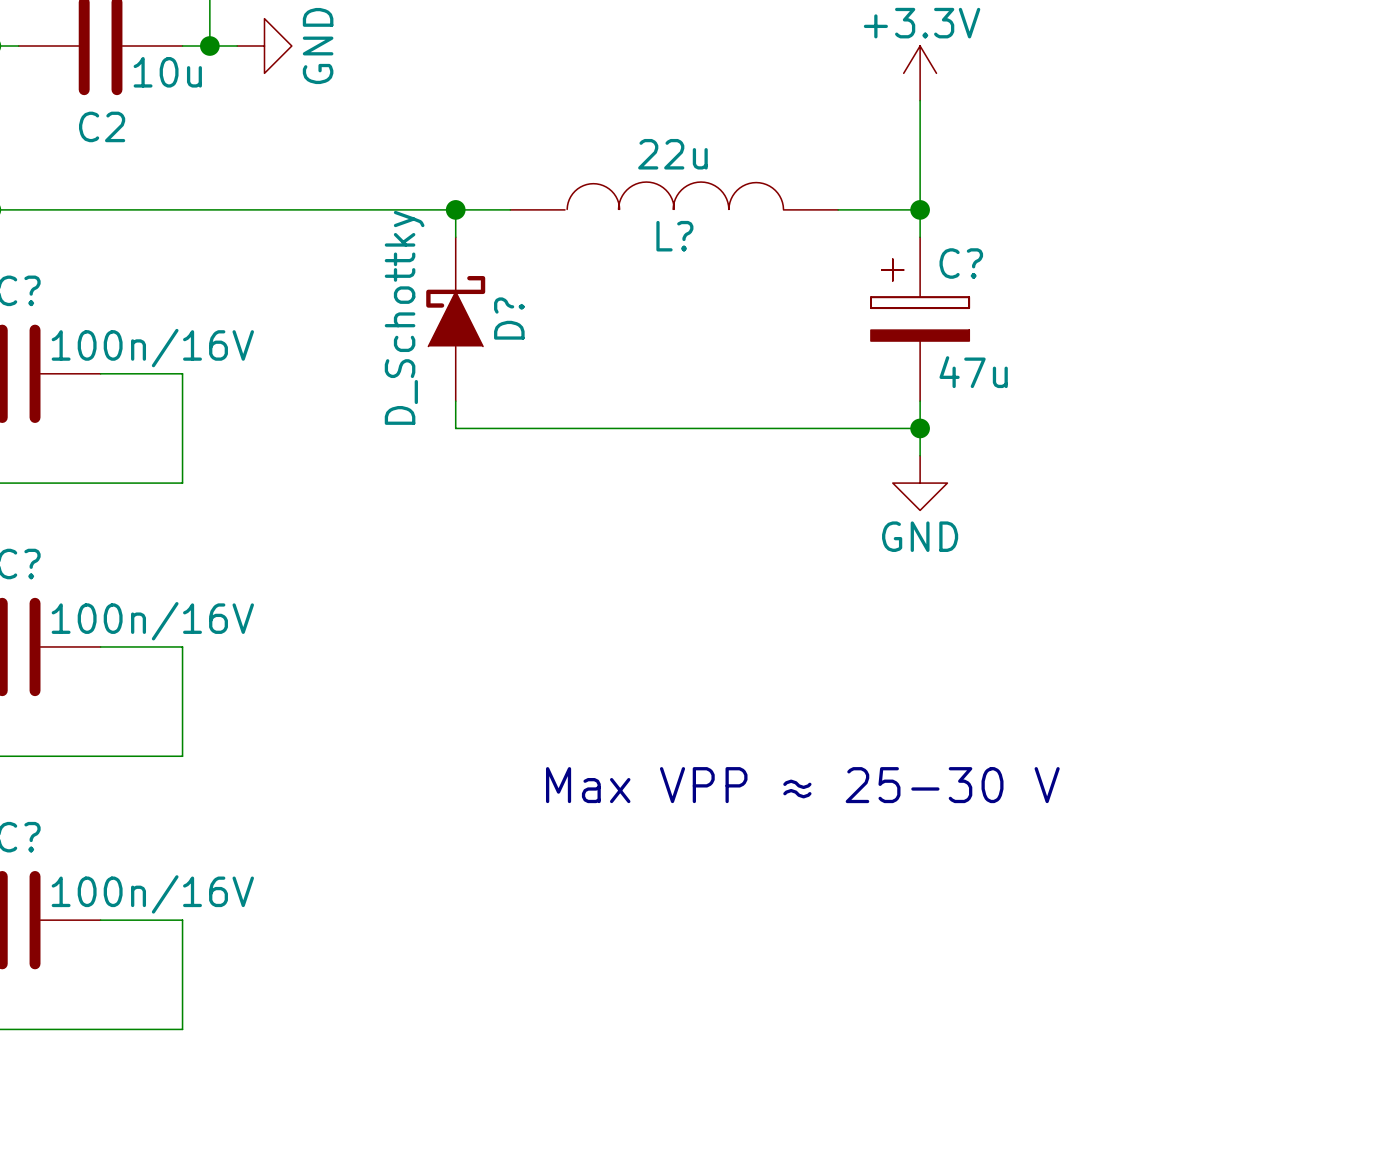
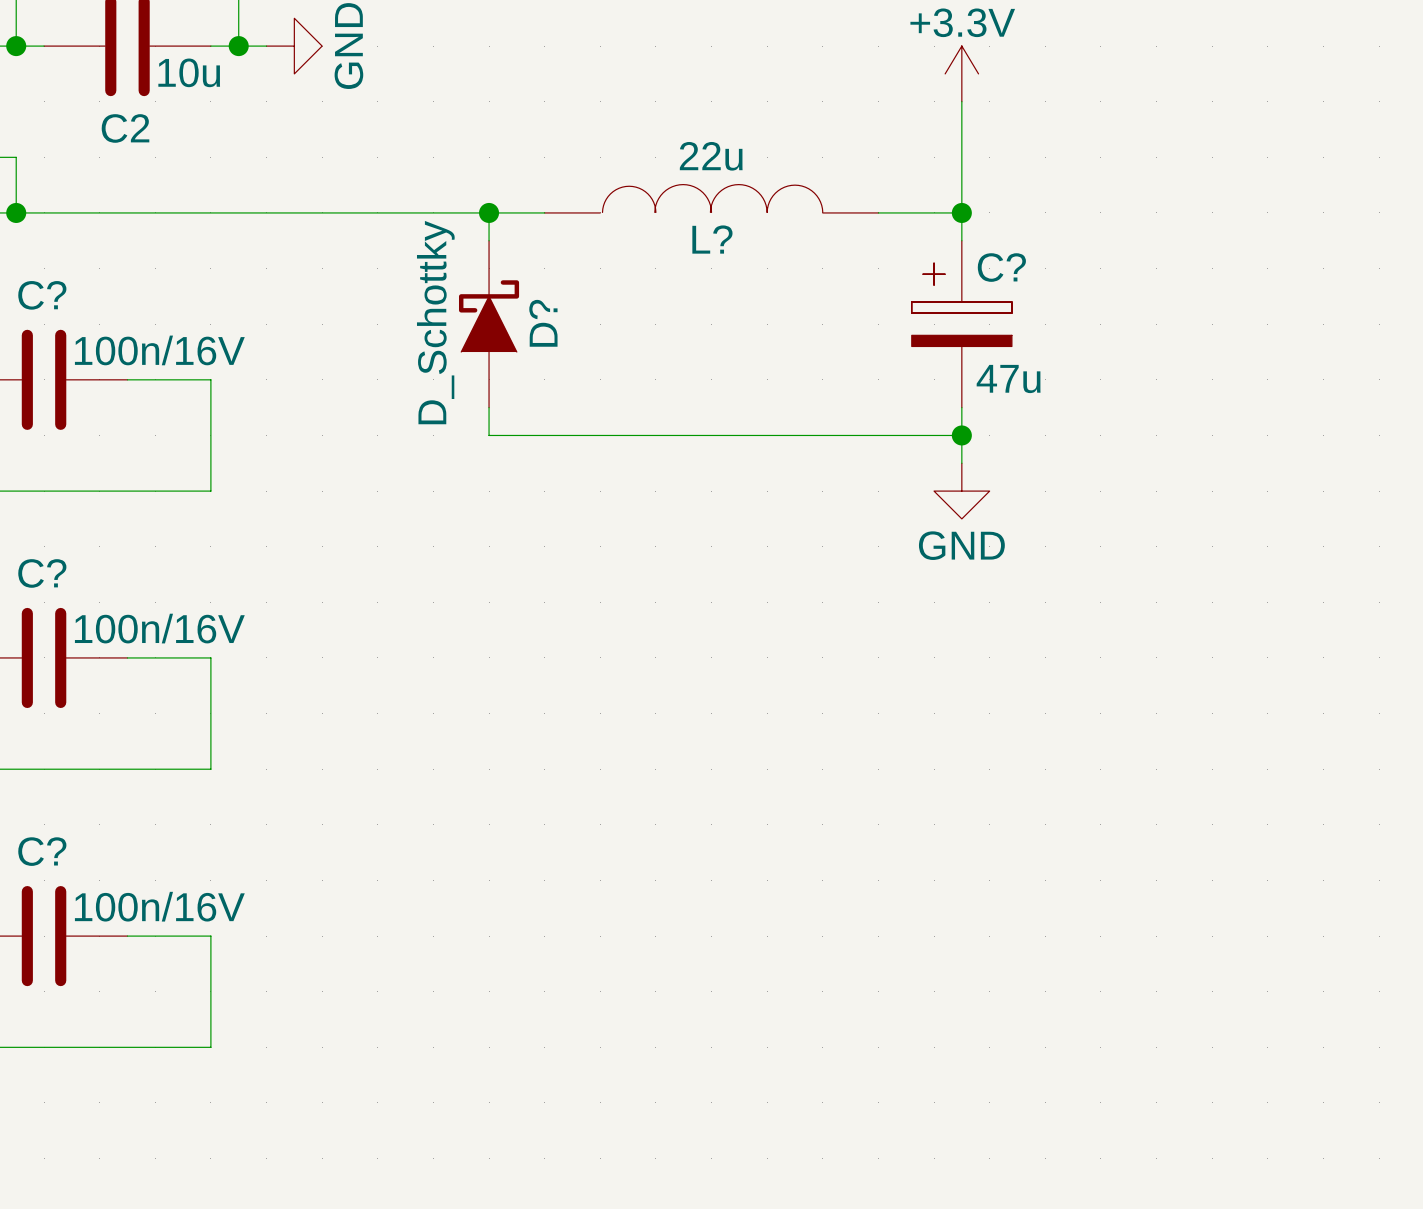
text: Max VPP ≈ 25-30 V (802, 785) -> none

